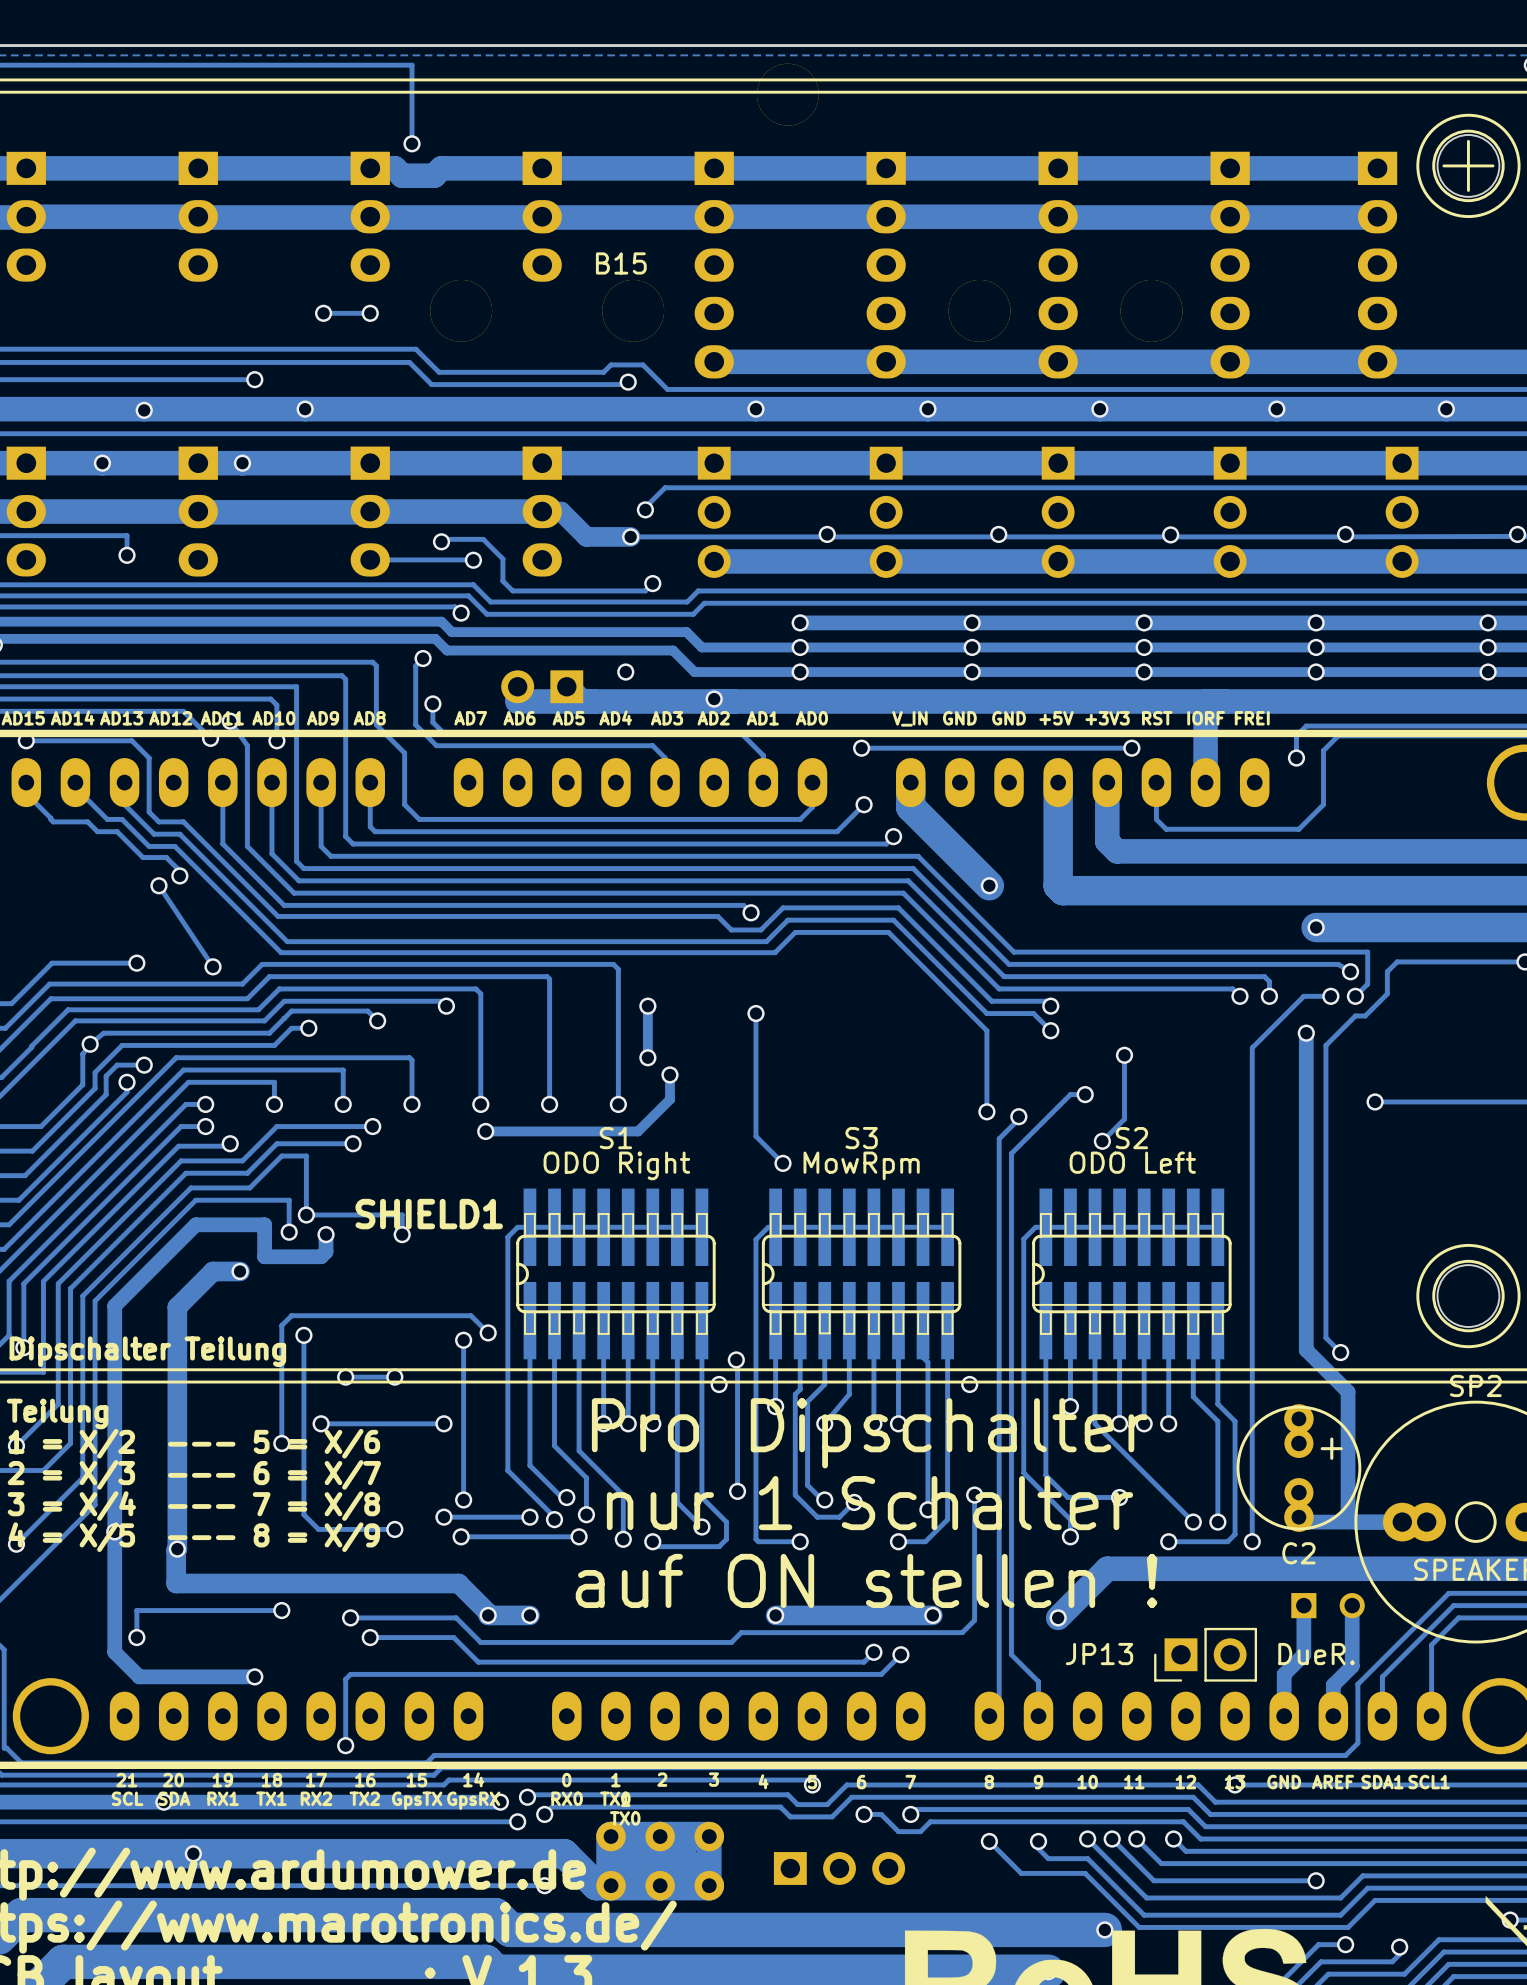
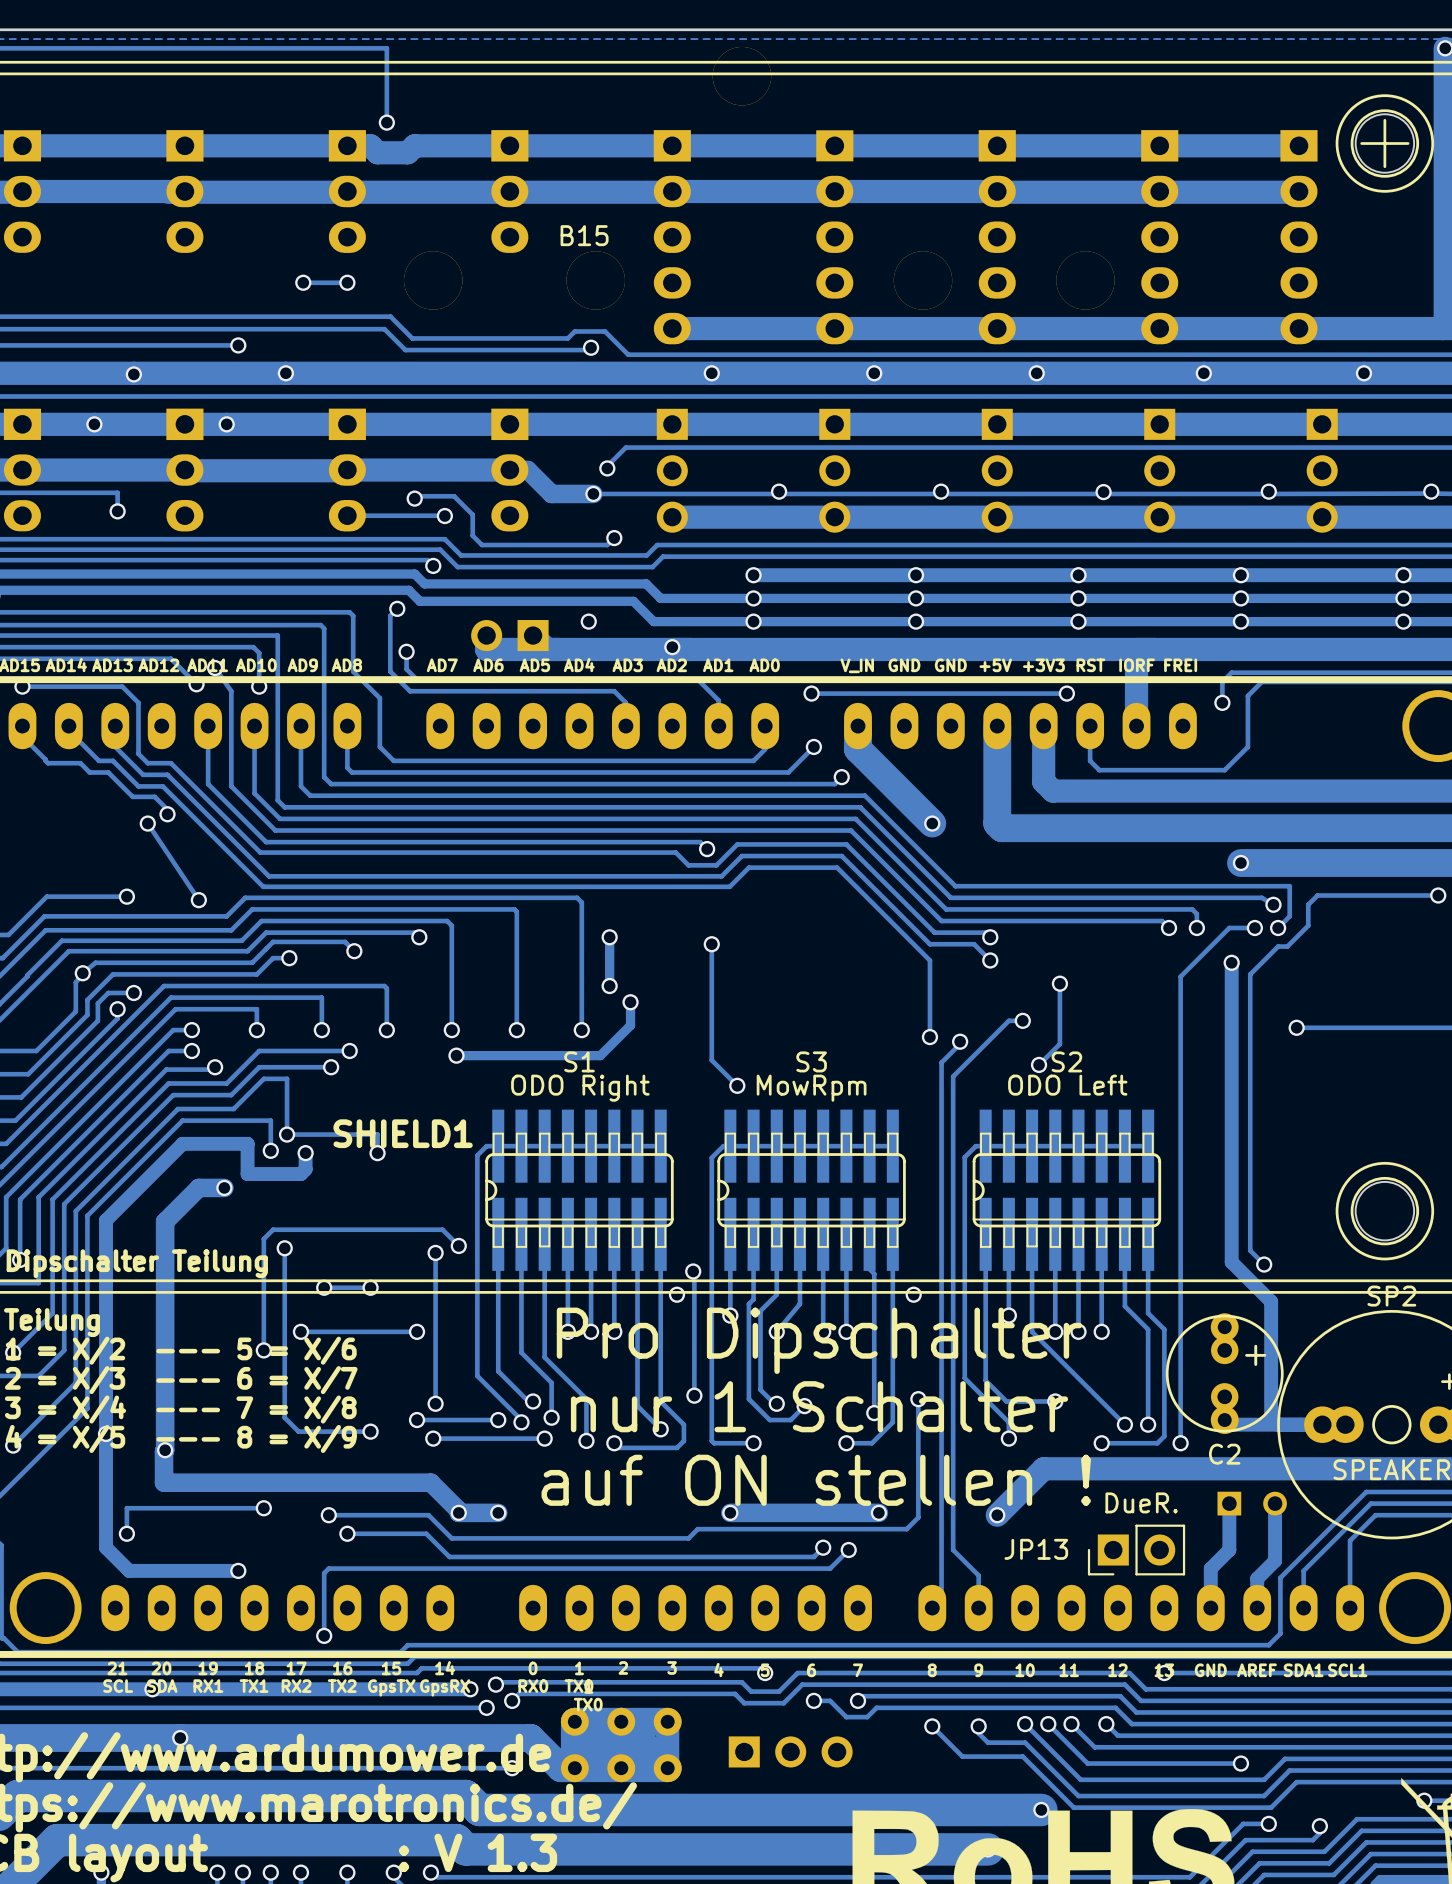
JP13 value position: DueR. (1316, 1654) -> DueR. (1141, 1502)

